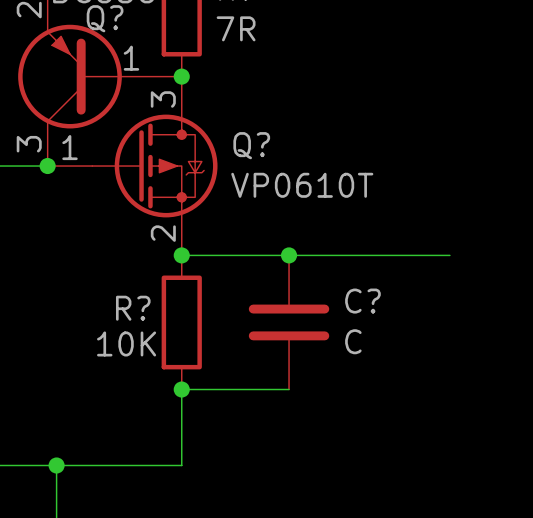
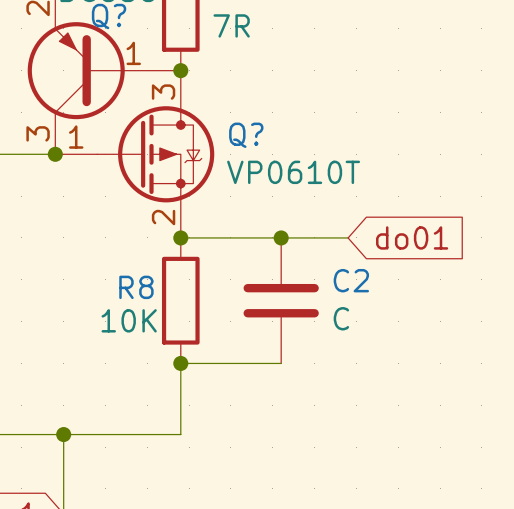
wire: (360, 255) (449, 255) -> none
global label: none -> do01 (412, 237)
C? name: C? (362, 301) -> C2 (351, 280)
R? name: R? (133, 308) -> R8 (136, 287)

